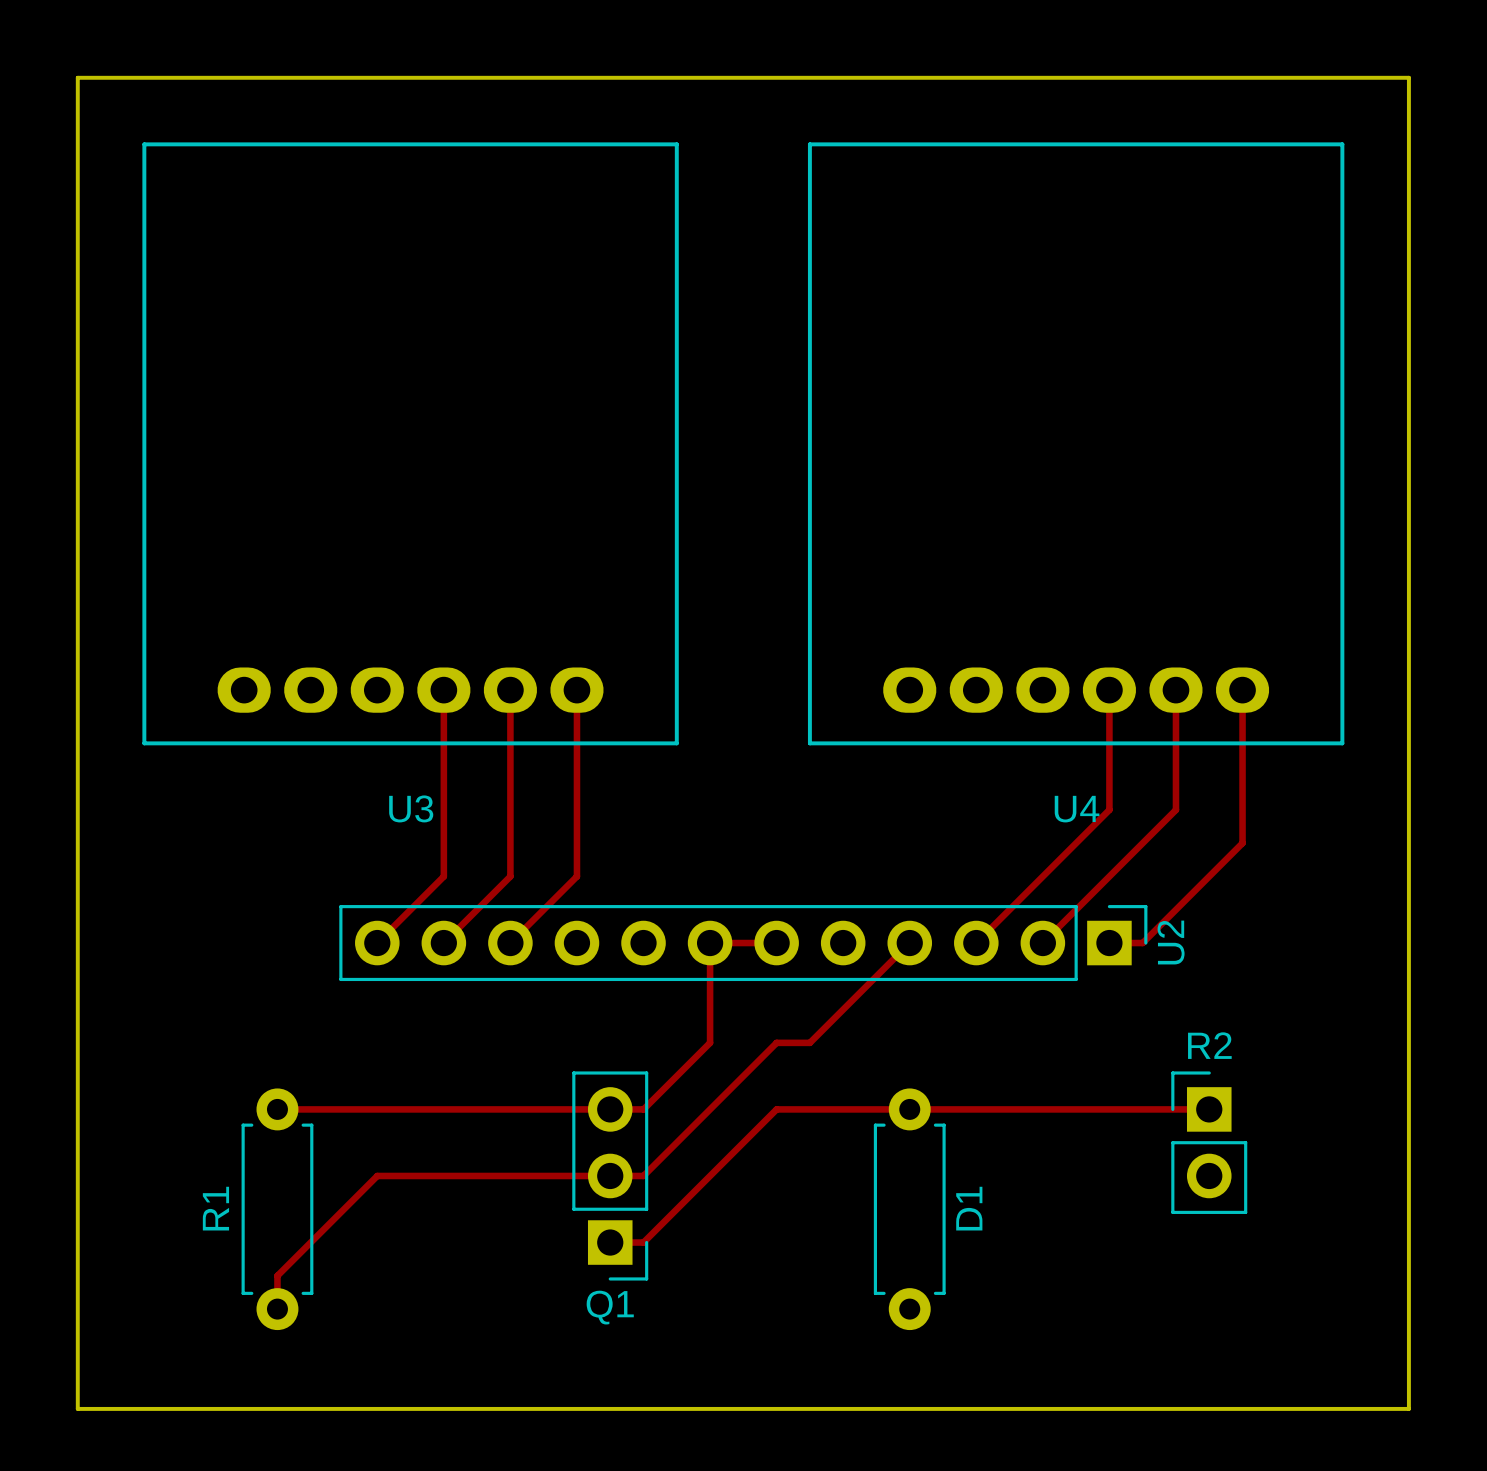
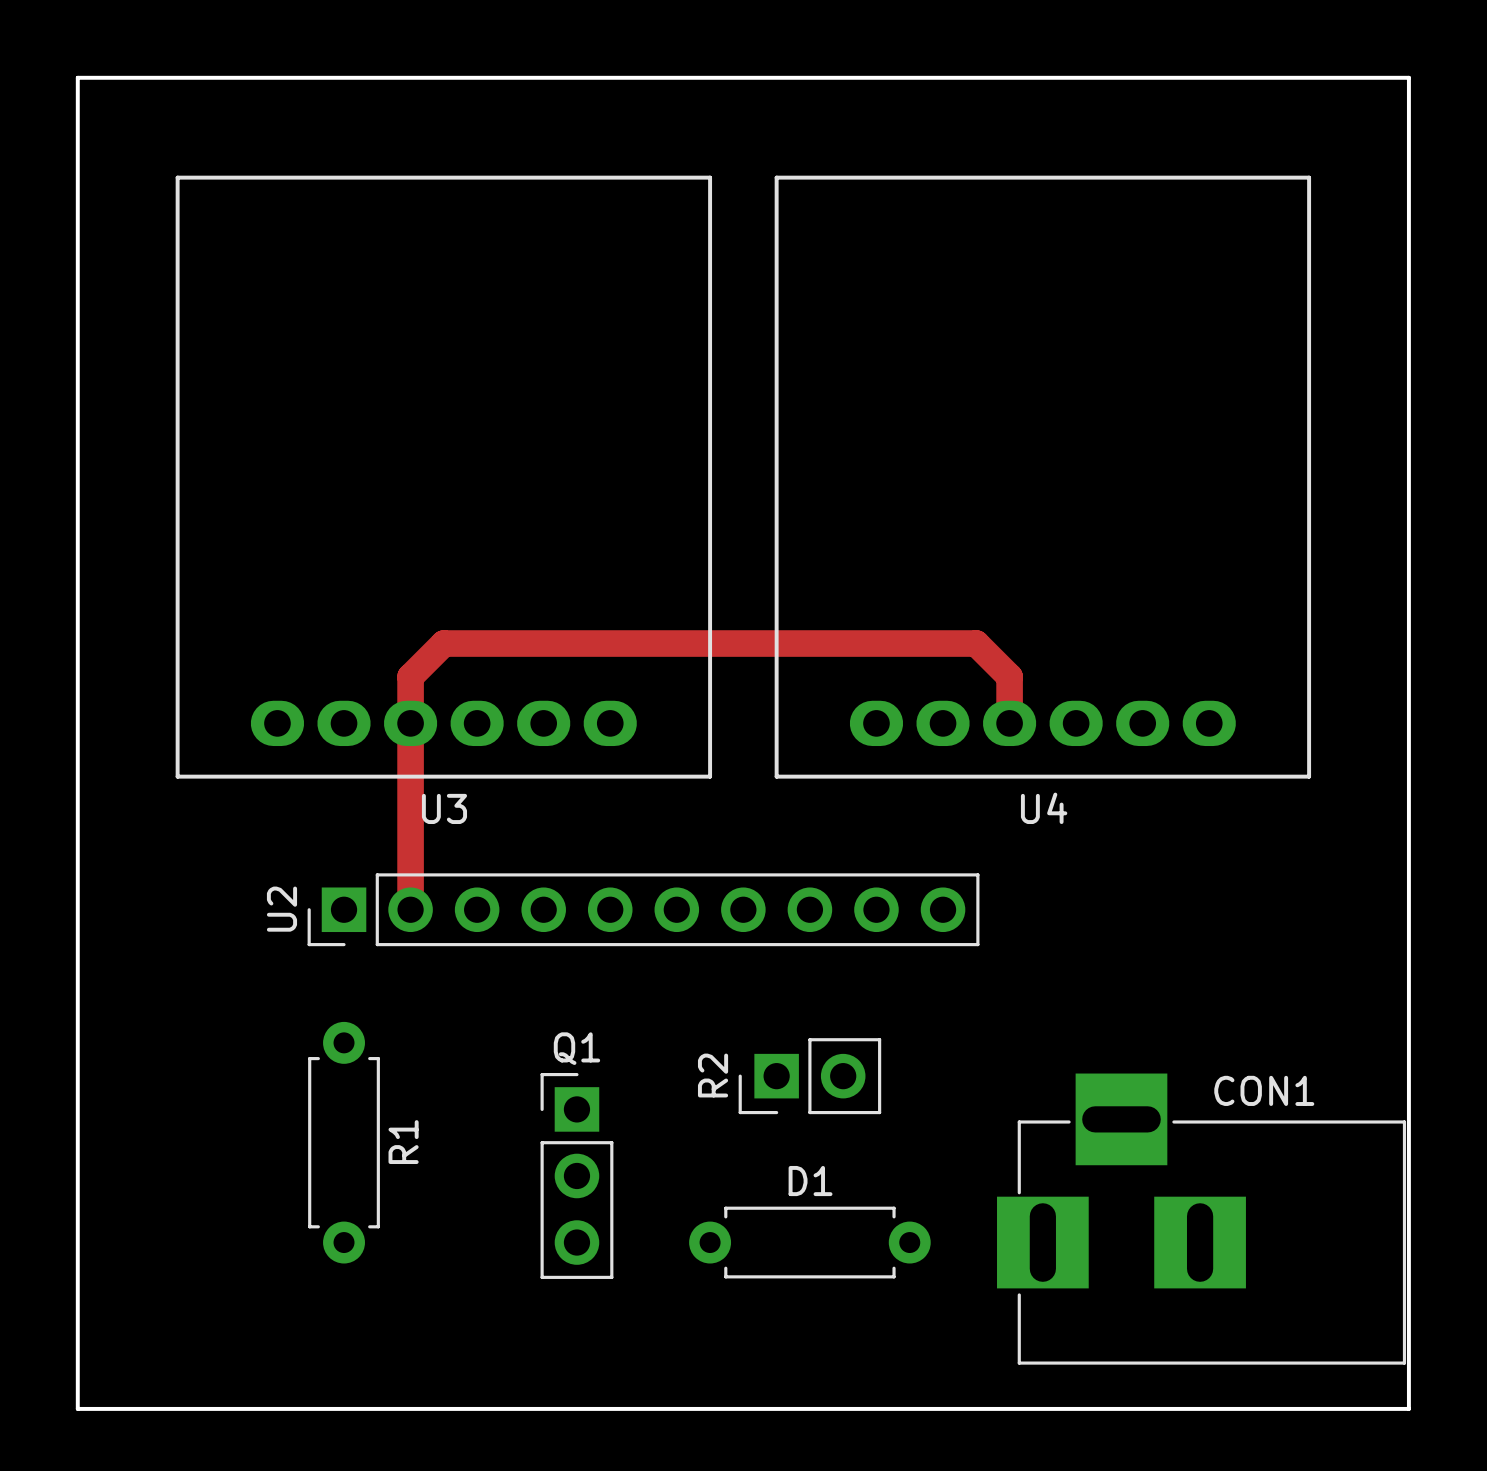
U3 position: (410, 443) -> (443, 477)
U4 position: (1076, 443) -> (1042, 477)
track: (443, 690) (443, 876) (377, 943) -> none
track: (510, 690) (510, 876) (443, 943) -> none
track: (576, 690) (576, 876) (510, 943) -> none
track: (1109, 690) (1109, 809) (976, 943) -> none
track: (1175, 690) (1175, 809) (1042, 943) -> none
track: (1242, 690) (1242, 843) (1142, 943) (1109, 943) -> none
track: none -> (1009, 723) (1009, 676) (976, 643) (443, 643) (410, 676) (410, 909)
U3 name position: U3 (411, 808) -> U3 (444, 808)
U4 name position: U4 (1077, 809) -> U4 (1044, 808)
U2 footprint: [339, 905, 1148, 982] -> [307, 873, 980, 947]
U2 name position: U2 (1171, 942) -> U2 (281, 909)
track: (776, 943) (710, 943) (710, 1042) (643, 1109) (277, 1109) -> none
track: (909, 943) (809, 1042) (776, 1042) (643, 1175) (377, 1175) (277, 1275) (277, 1309) -> none
Q1 footprint: [572, 1071, 649, 1281] -> [540, 1073, 614, 1279]
track: (1209, 1109) (776, 1109) (643, 1242) (610, 1242) -> none
R2 rotation: 0° (1209, 1142) -> 90° counterclockwise (809, 1076)
R2 position: (1209, 1142) -> (809, 1076)
R1 name position: R1 (215, 1208) -> R1 (403, 1142)
D1 name position: D1 (969, 1208) -> D1 (810, 1181)
R1 position: (277, 1209) -> (344, 1142)
D1 rotation: 0° (909, 1209) -> 90° clockwise (809, 1242)
CON1: none -> (1201, 1219)
Q1 name position: Q1 (610, 1307) -> Q1 (576, 1048)

